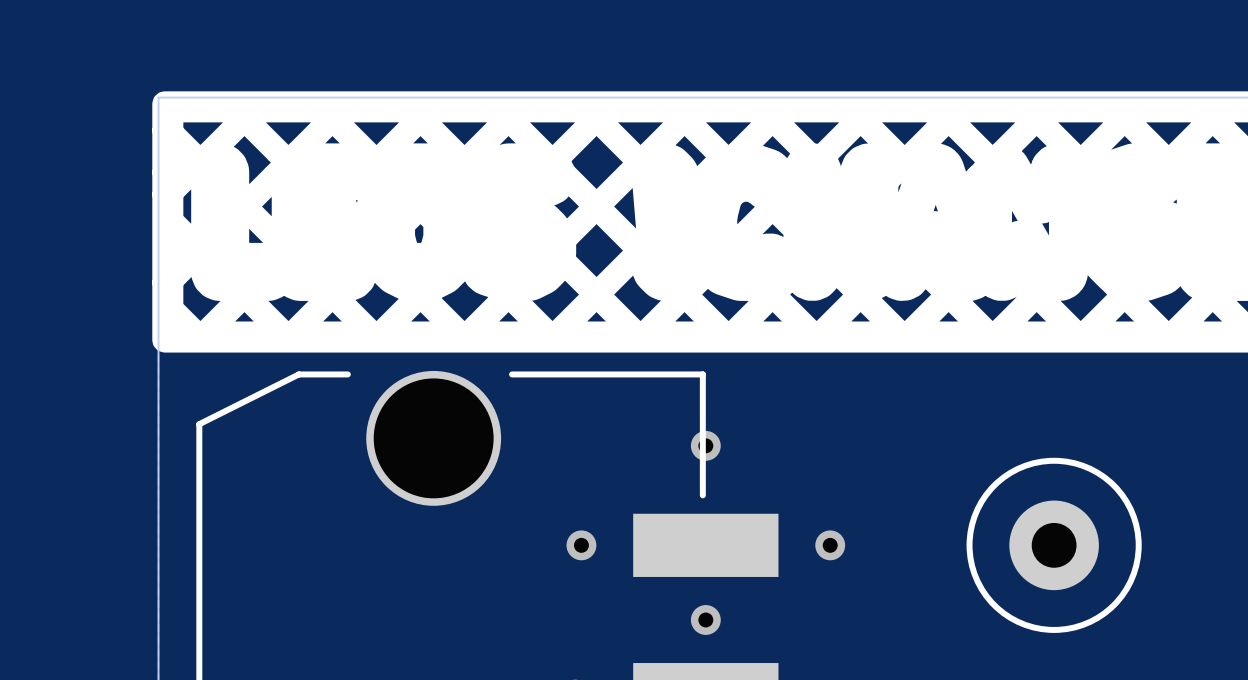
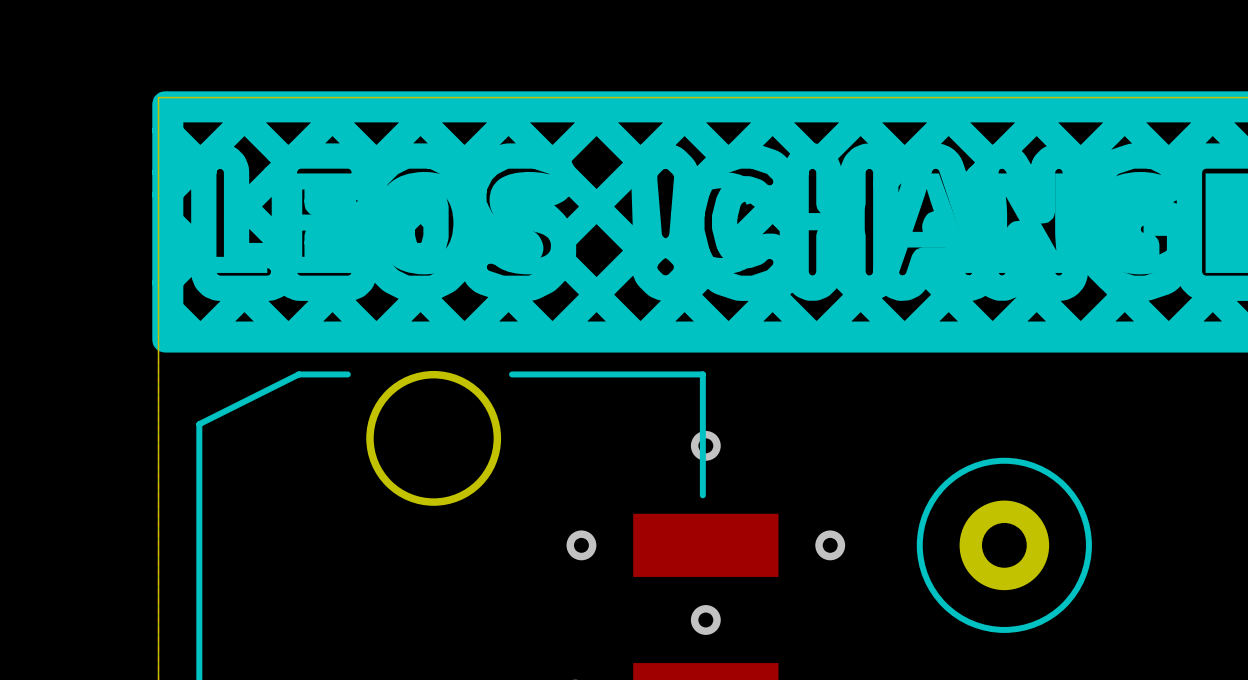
part position: (1054, 545) -> (1004, 545)

